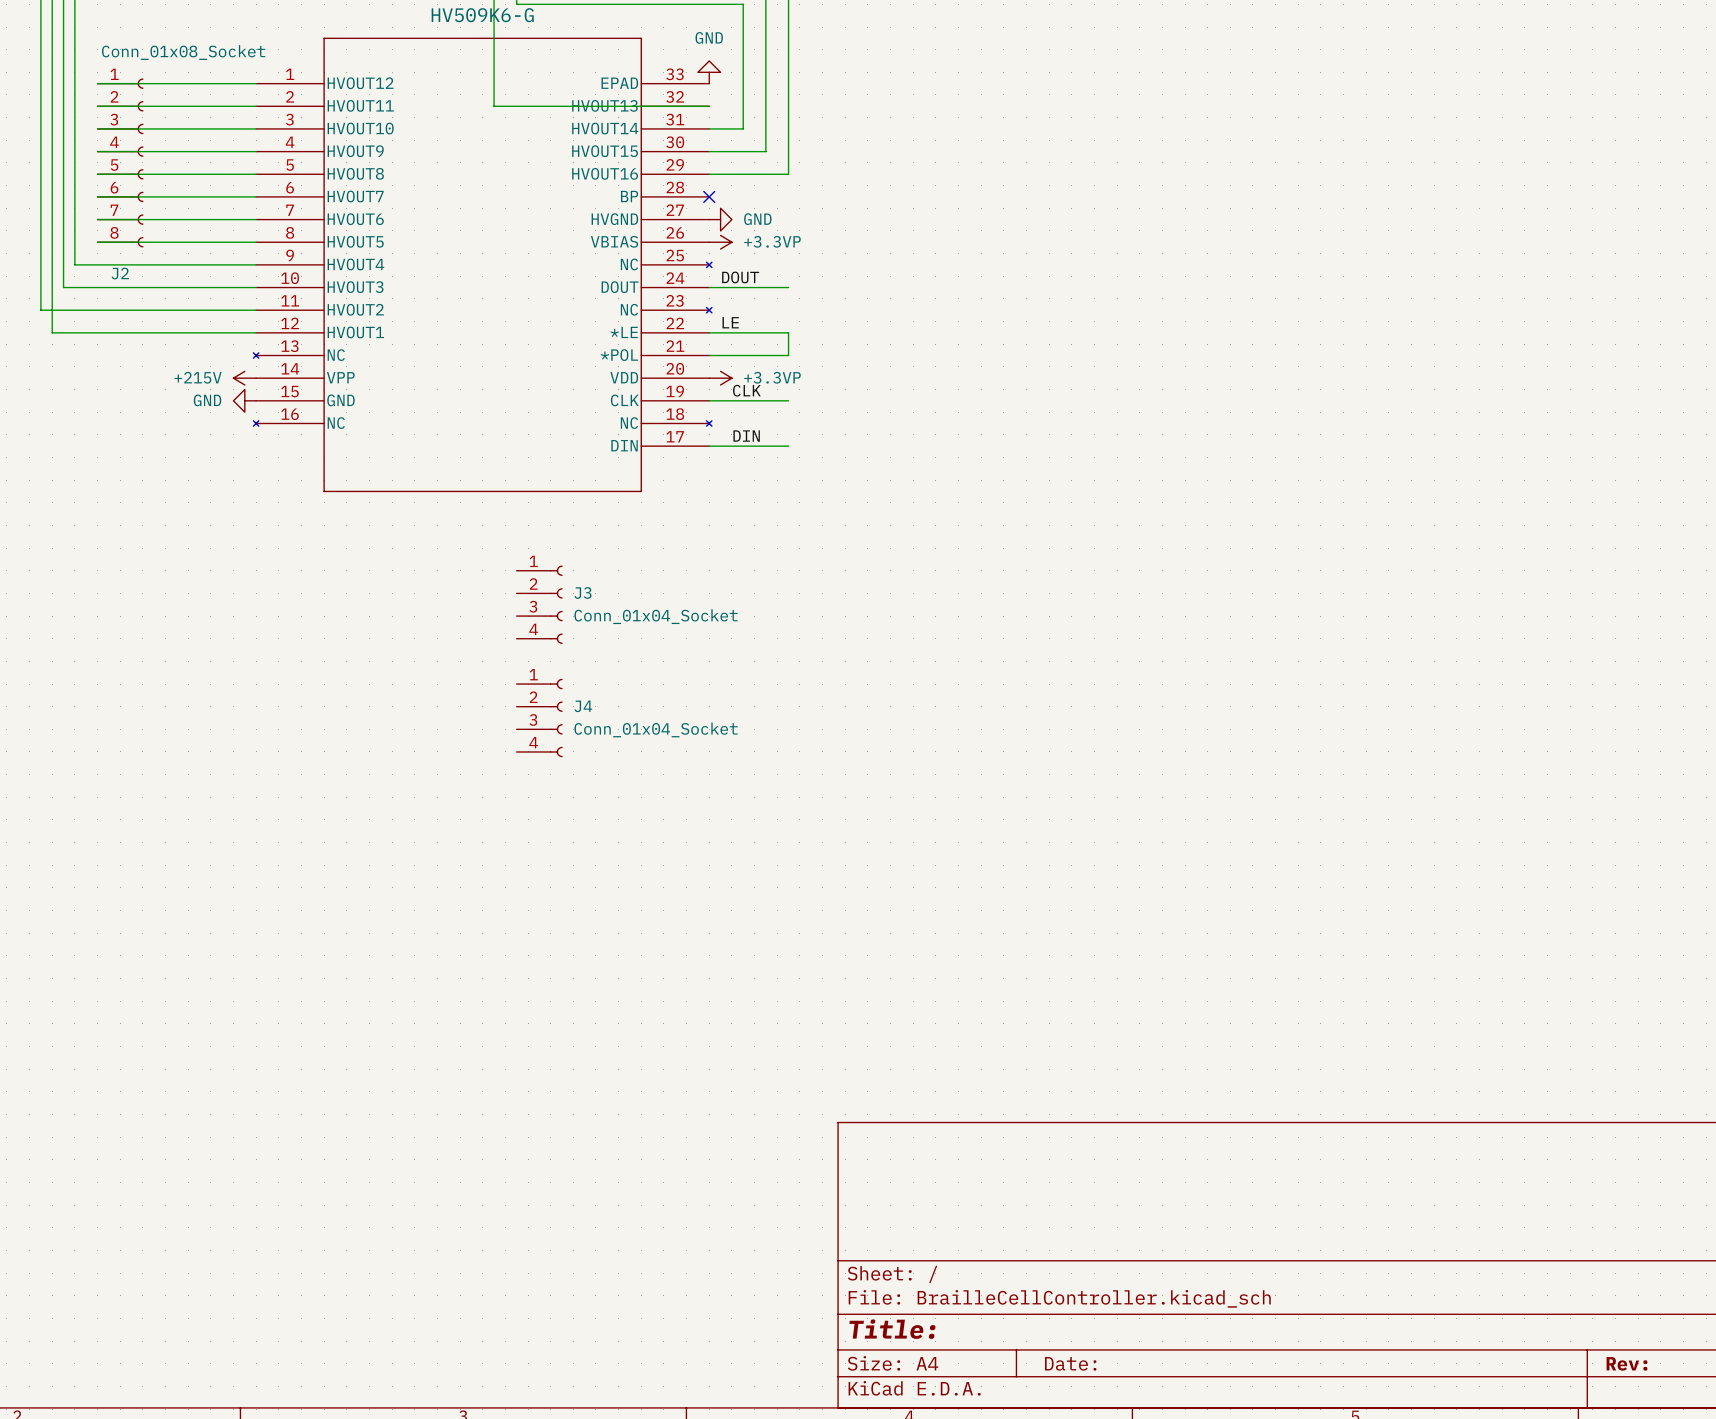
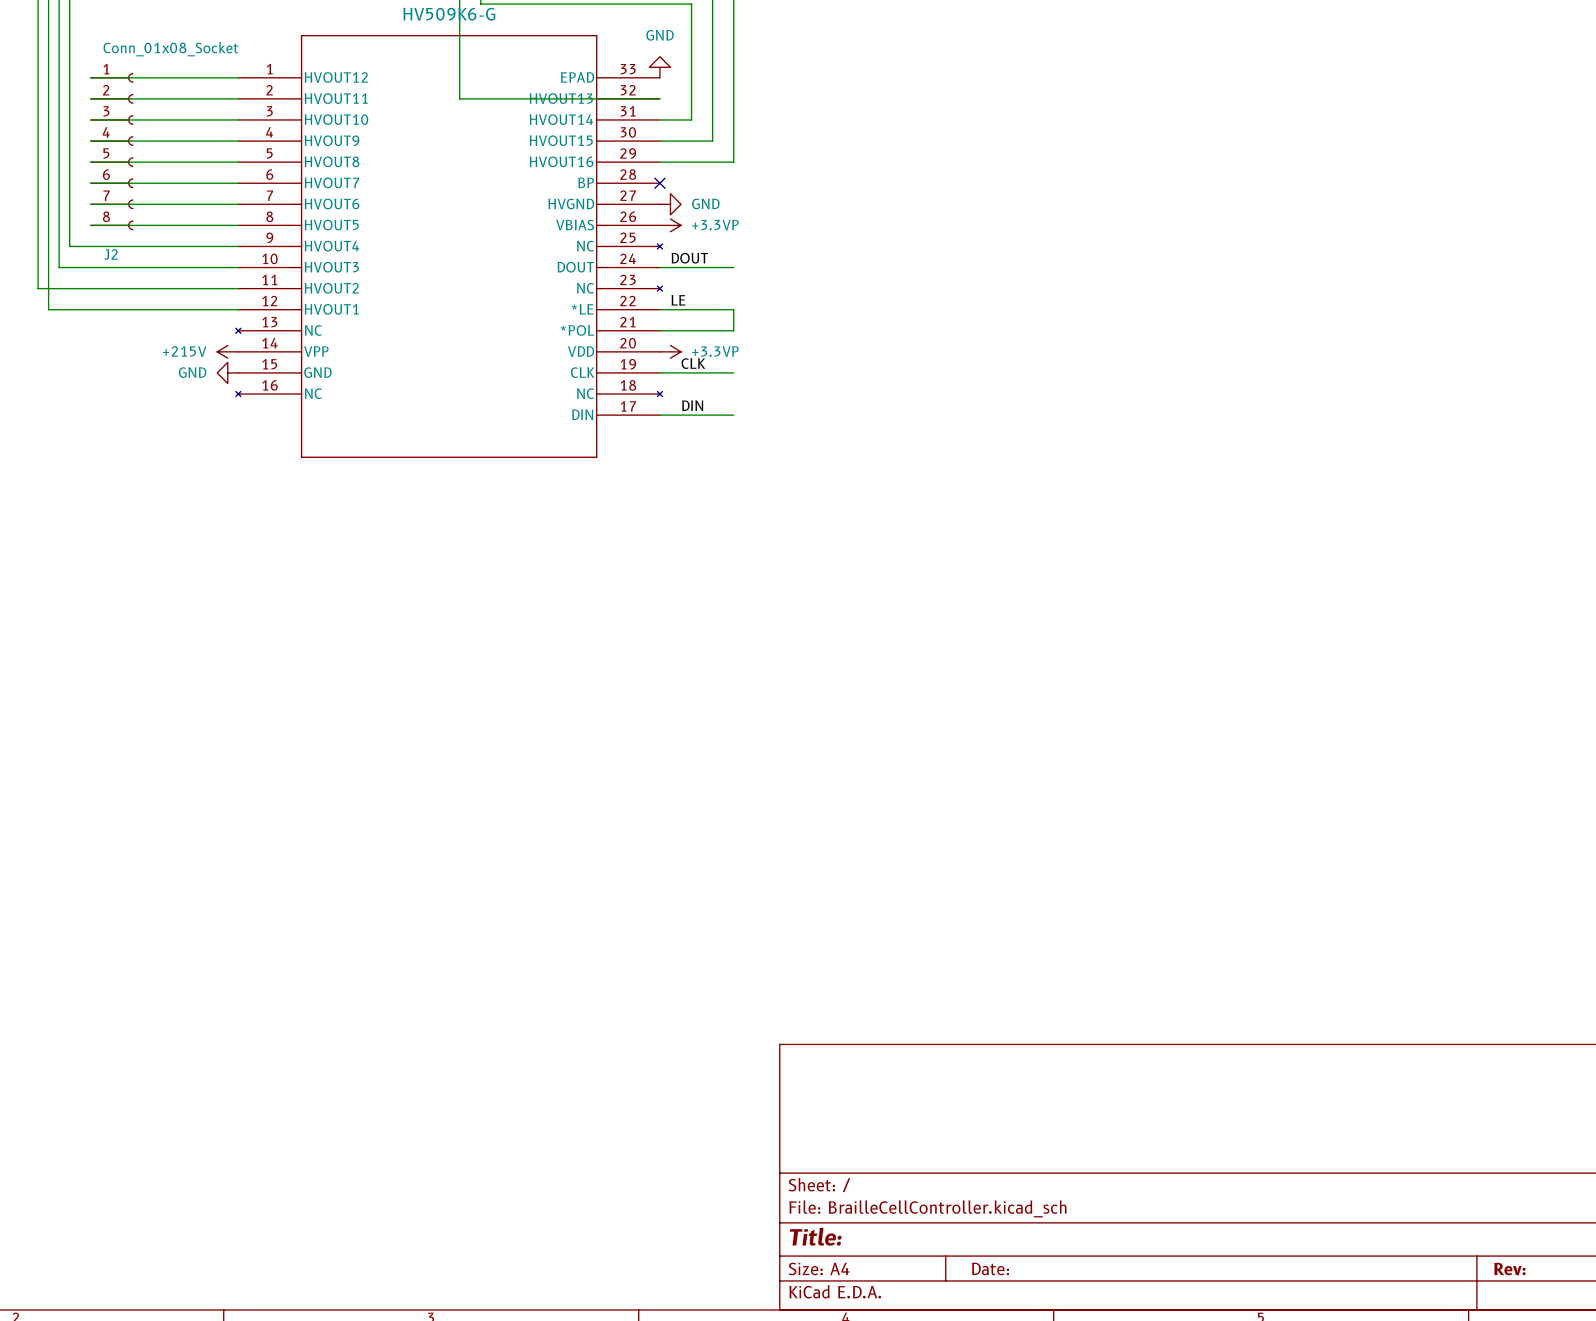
J3: Conn_01x04_Socket (539, 604) -> none
J4: Conn_01x04_Socket (539, 718) -> none

